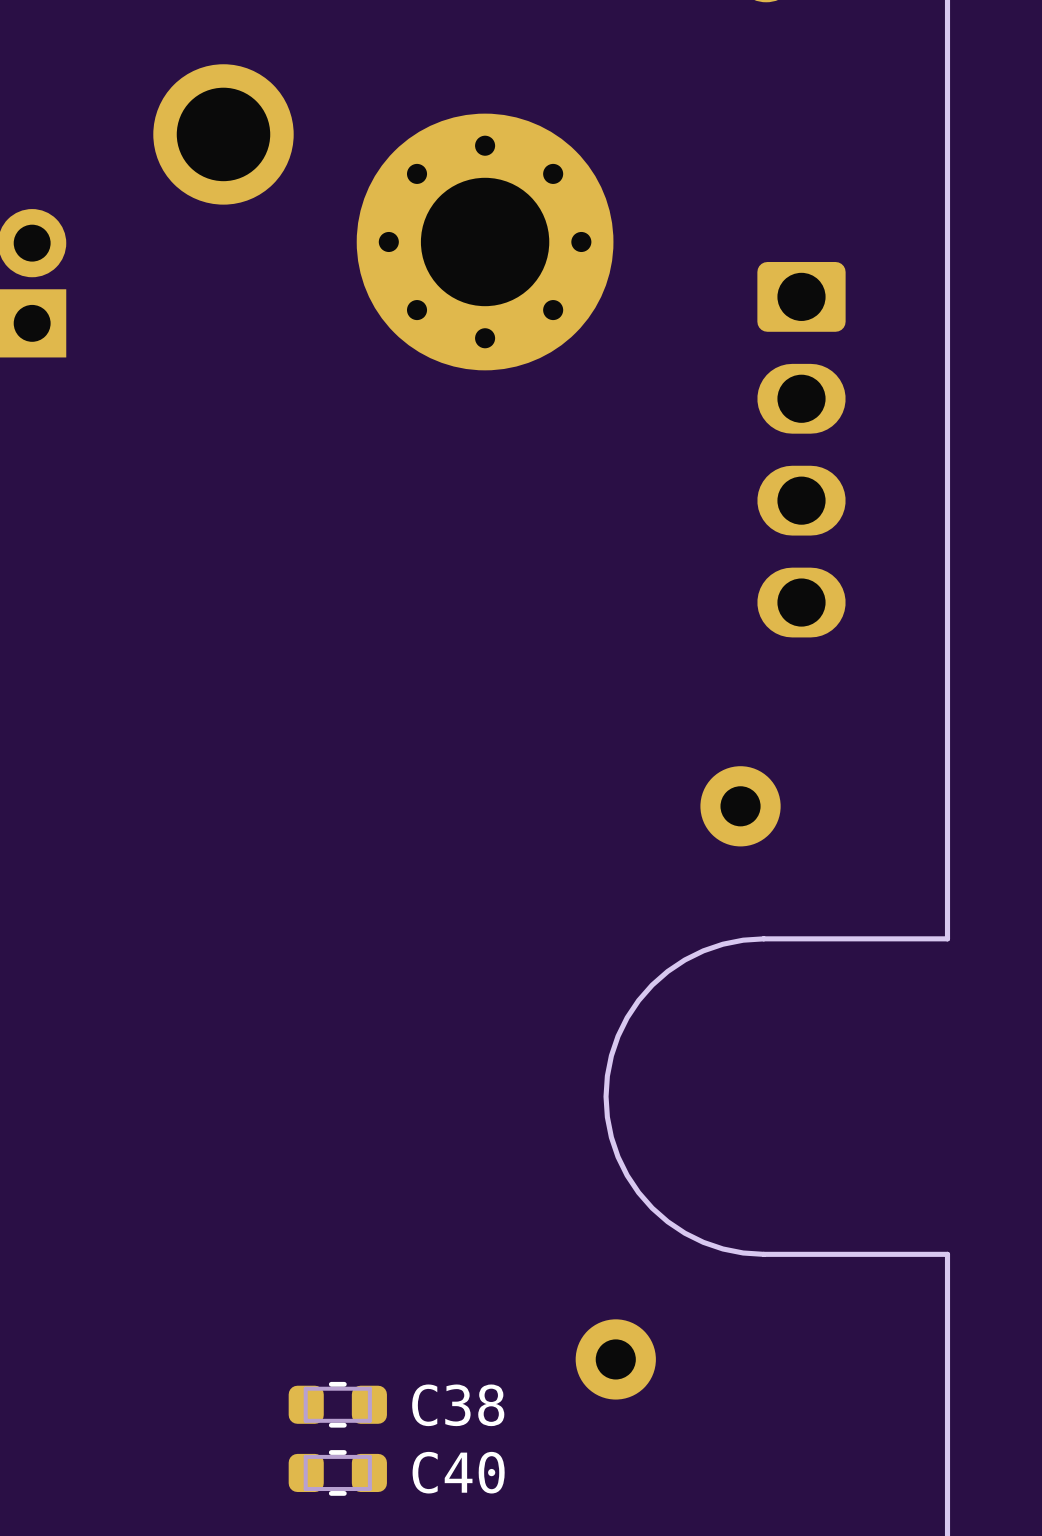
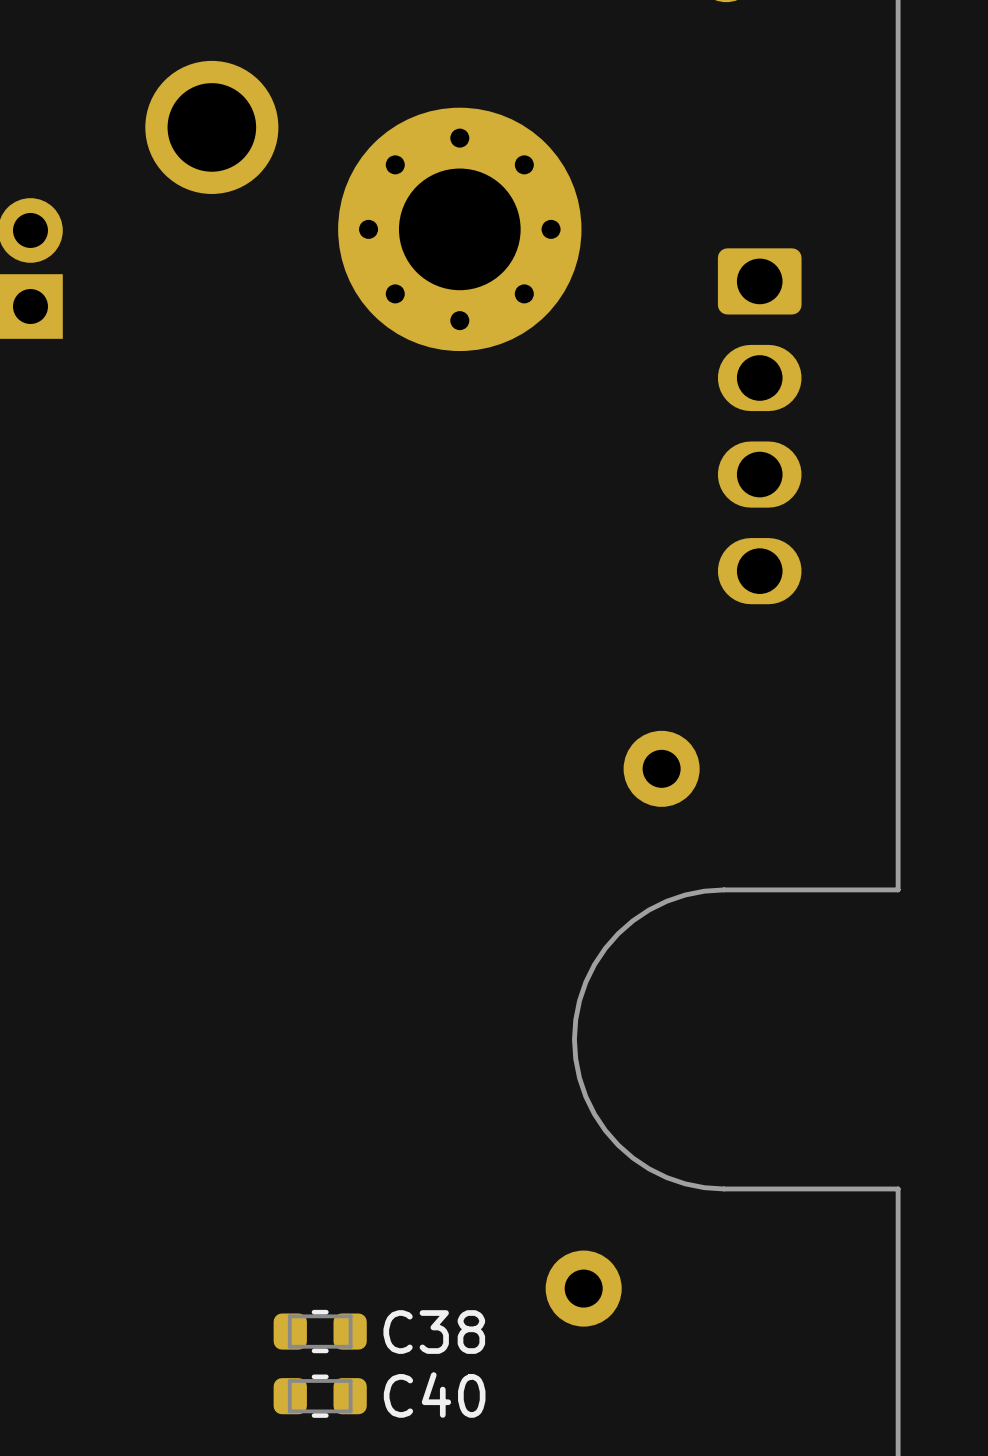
part position: (740, 806) -> (661, 768)

